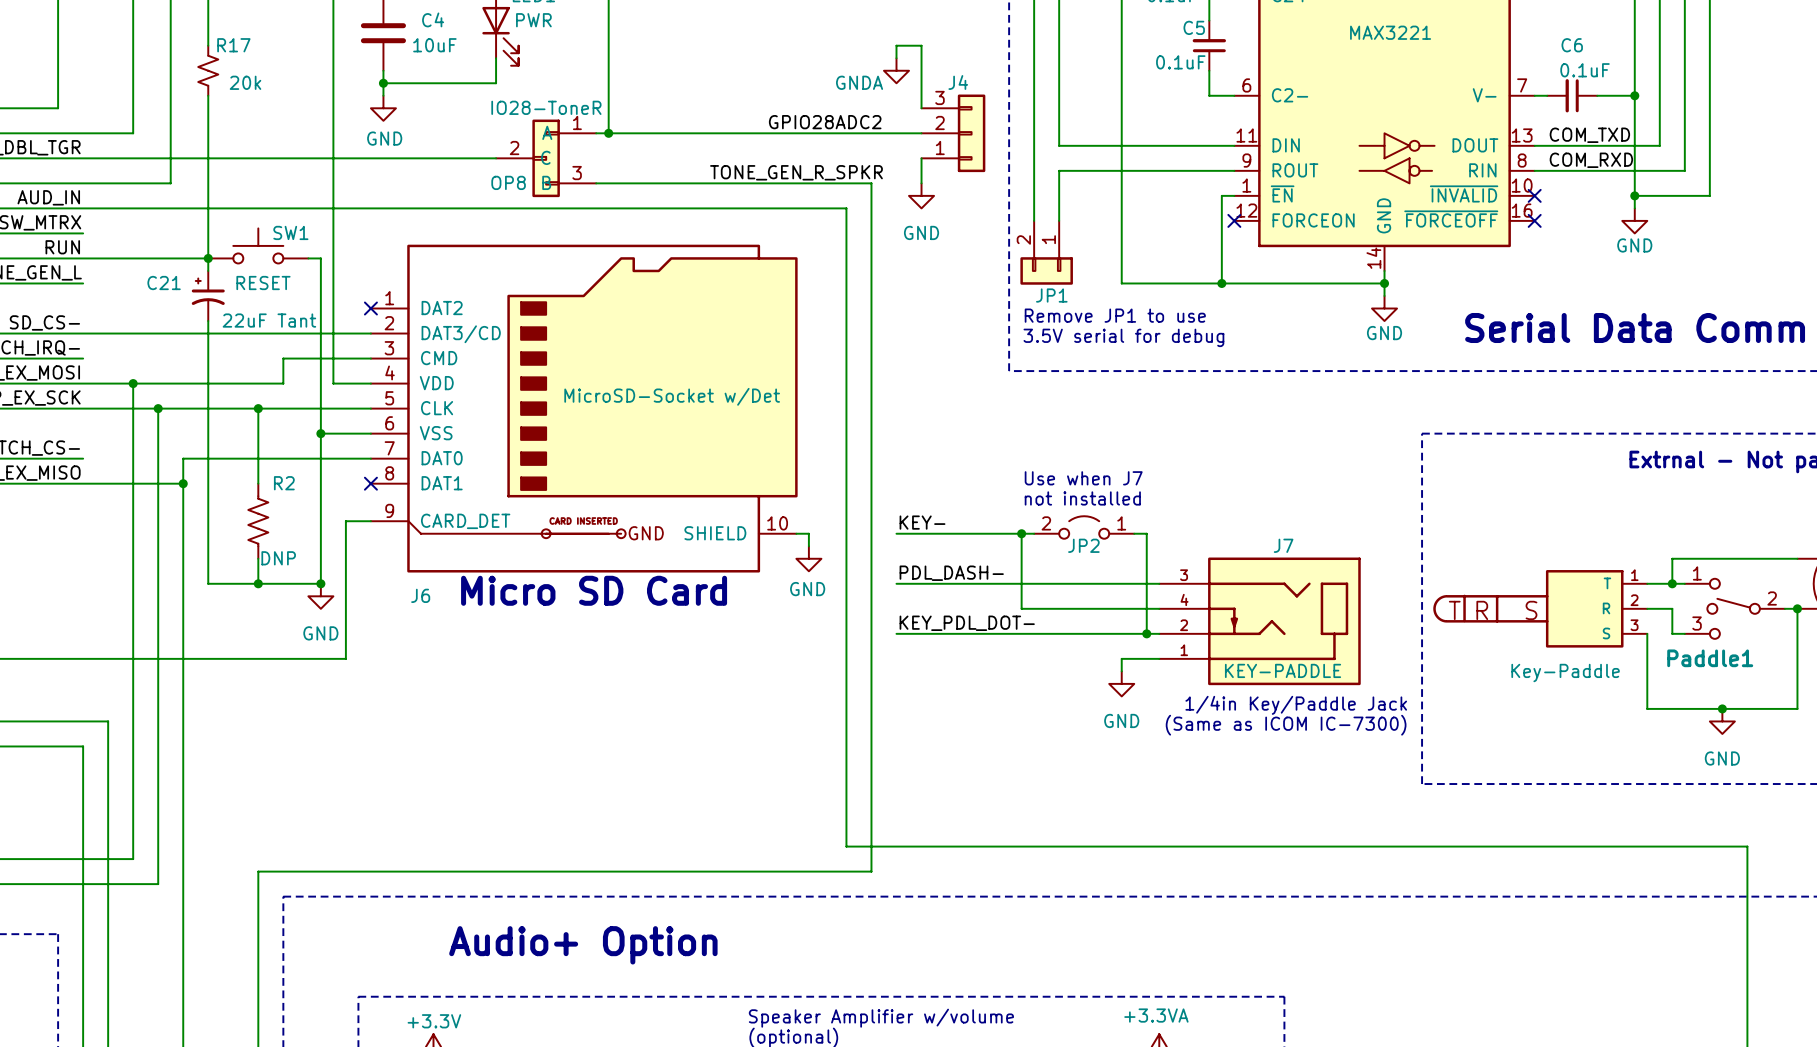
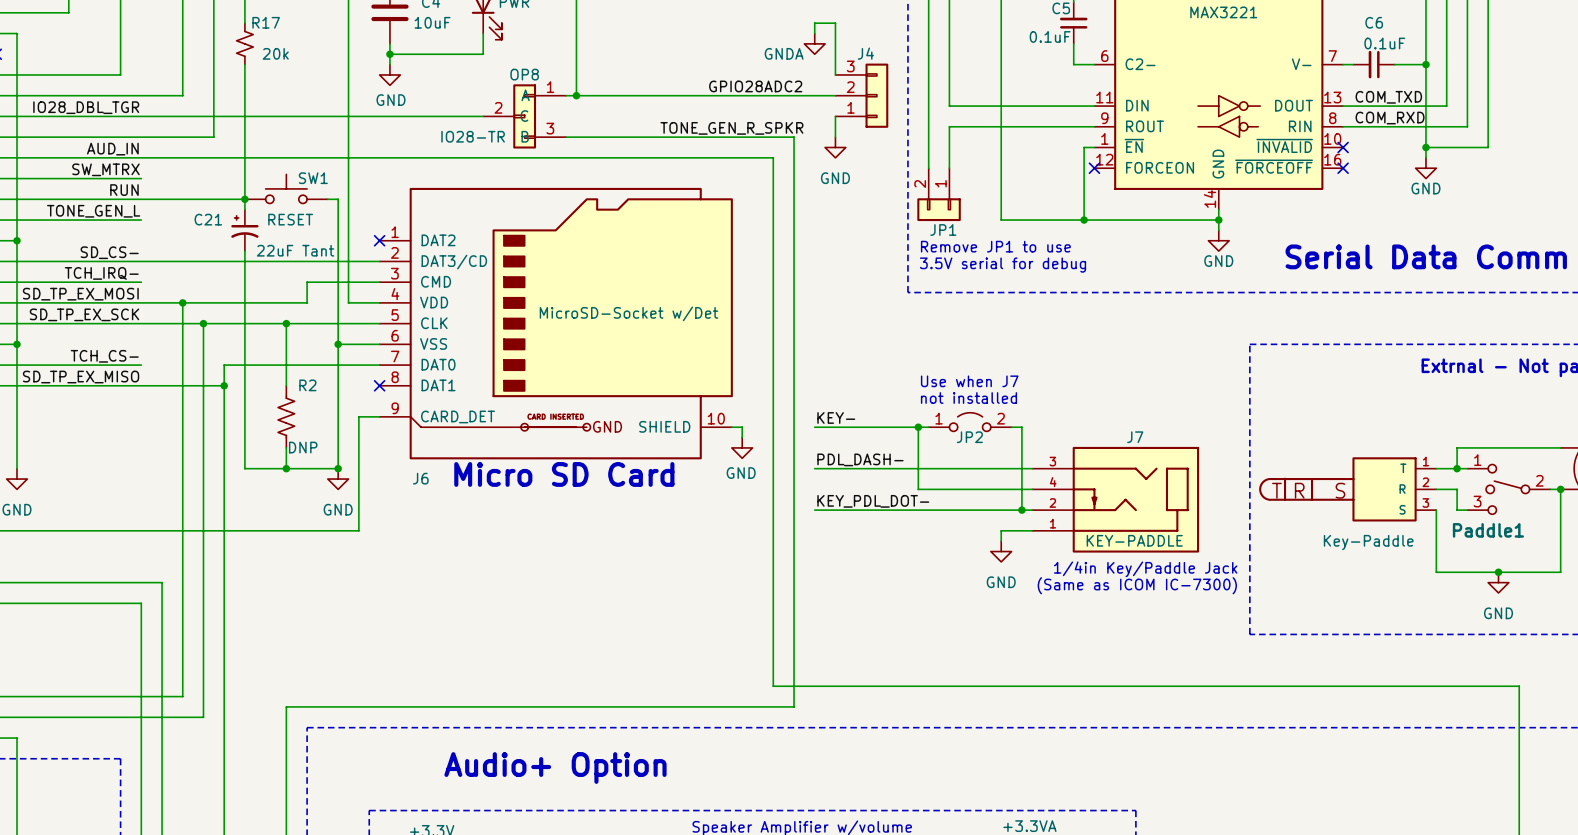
OP8 value: IO28-ToneR (546, 107) -> IO28-TR (473, 136)
OP8 name position: OP8 (508, 182) -> OP8 (524, 74)
JP2 flip: as is (1084, 527) -> left-right (970, 422)

